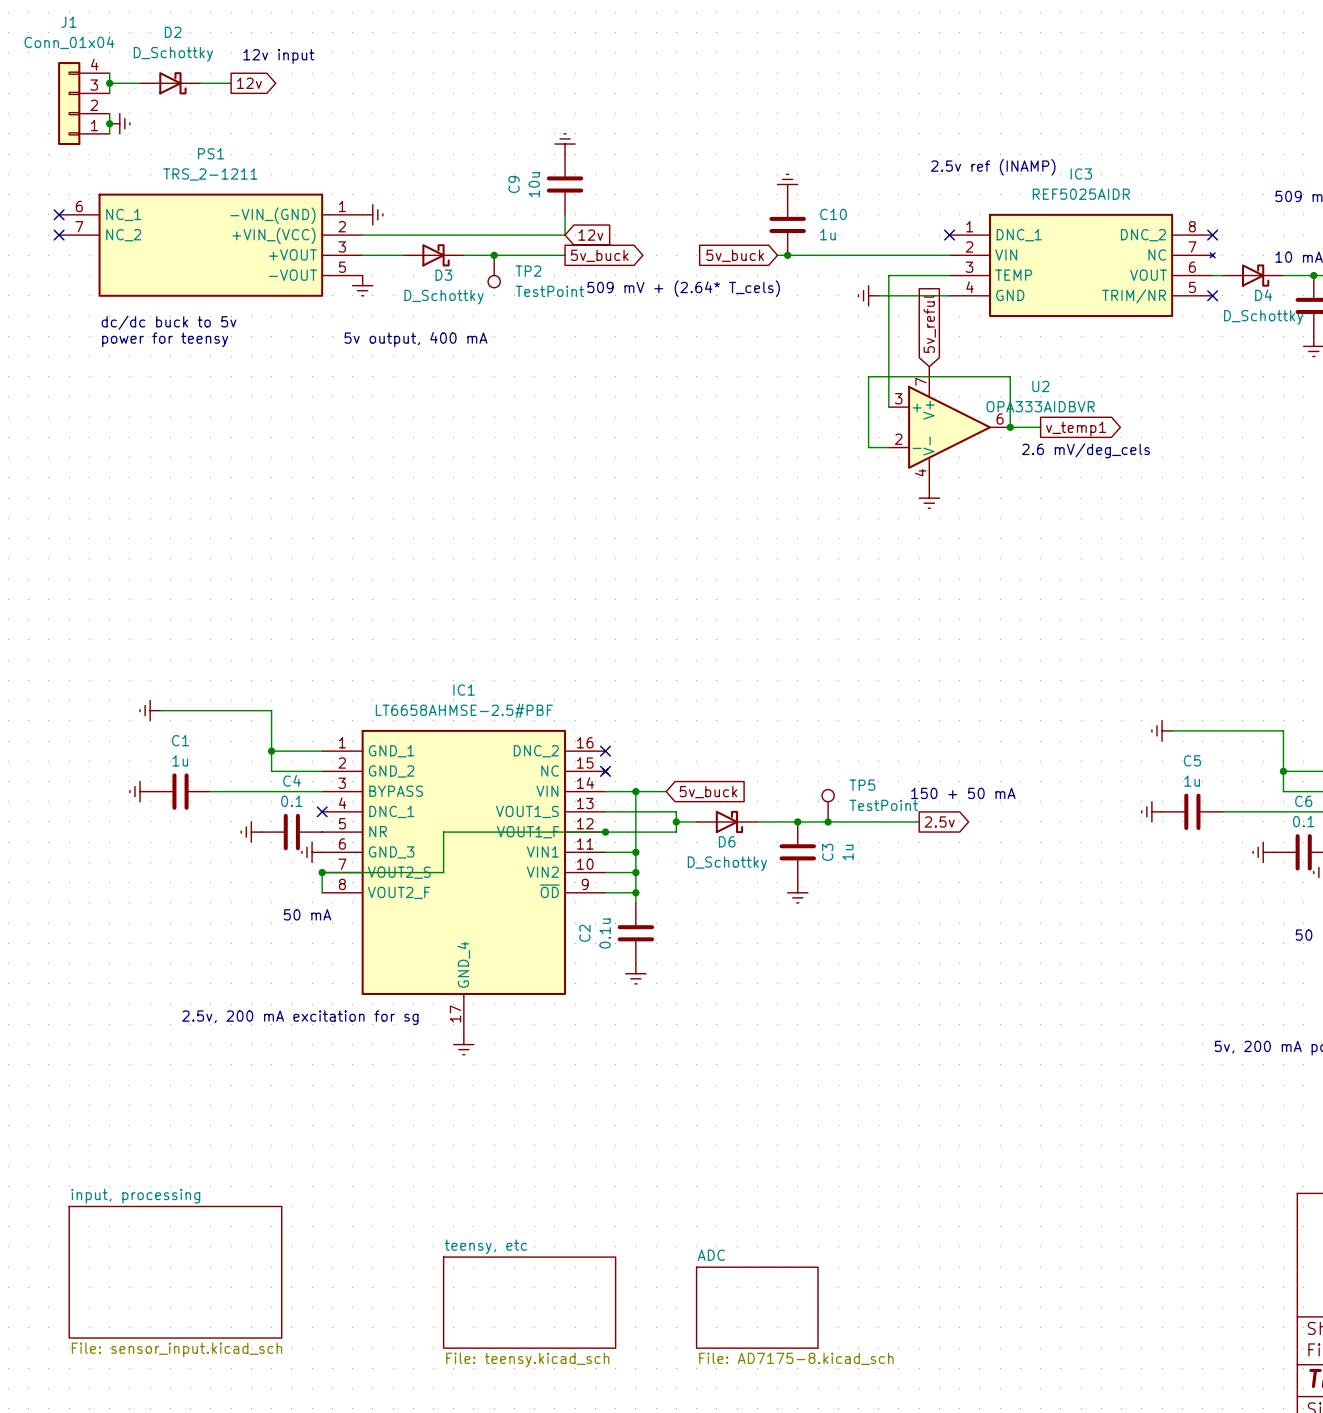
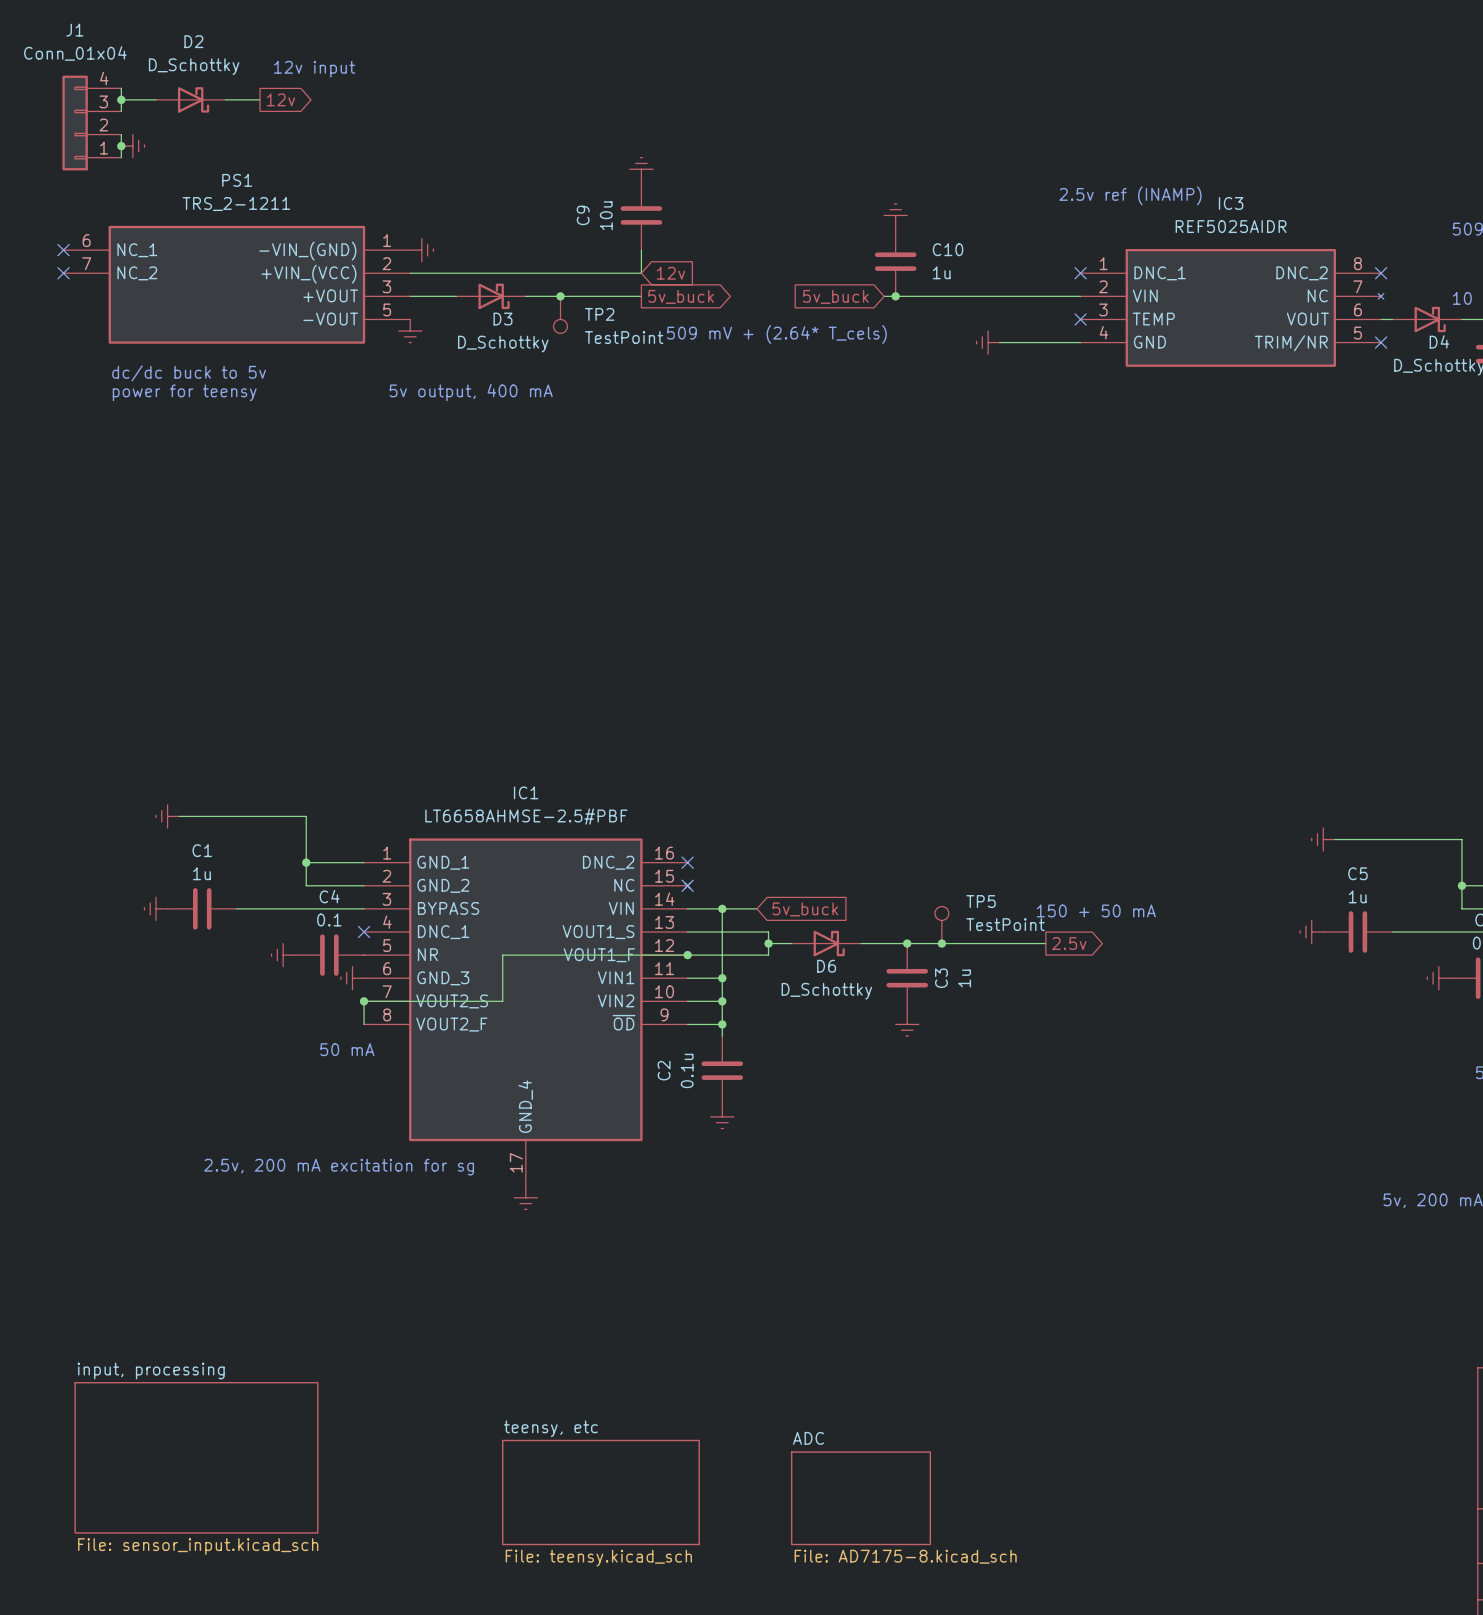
wire: (949, 275) (888, 275) (888, 407) -> none
no-connect mark: none -> (1080, 319)
global label: 5v_reful (929, 324) -> none
U2: OPA333AIDBVR (949, 427) -> none
junction: (1010, 427) -> none
wire: (1040, 427) (1010, 427) (1010, 376) (868, 376) (868, 447) (888, 447) -> none
global label: v_temp1 (1076, 429) -> none
text: 2.6 mV/deg_cels (1085, 450) -> none
power symbol: (929, 498) -> none

